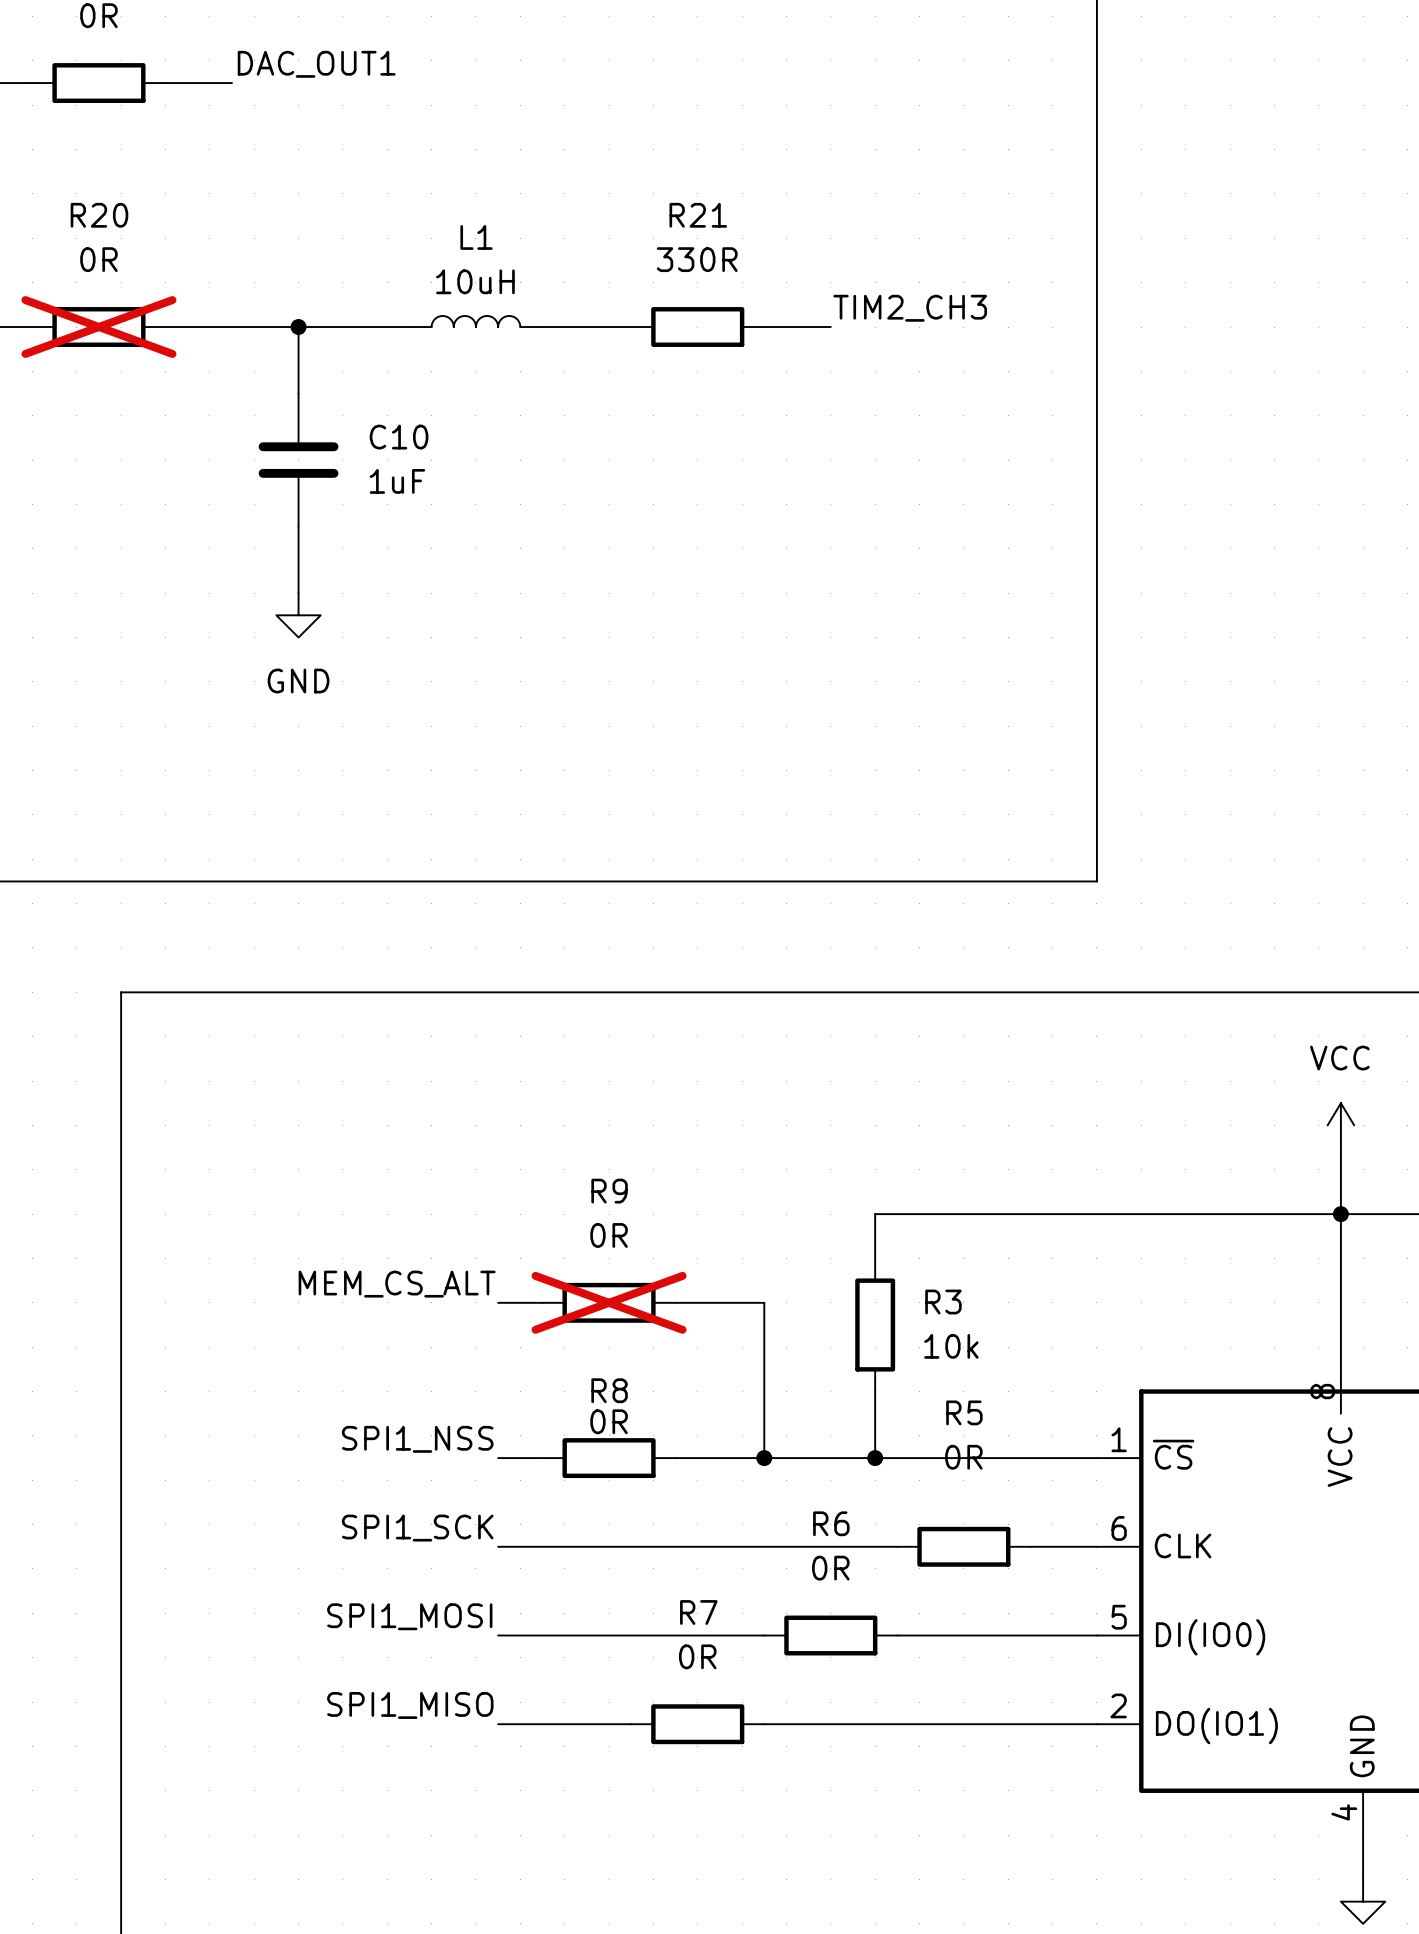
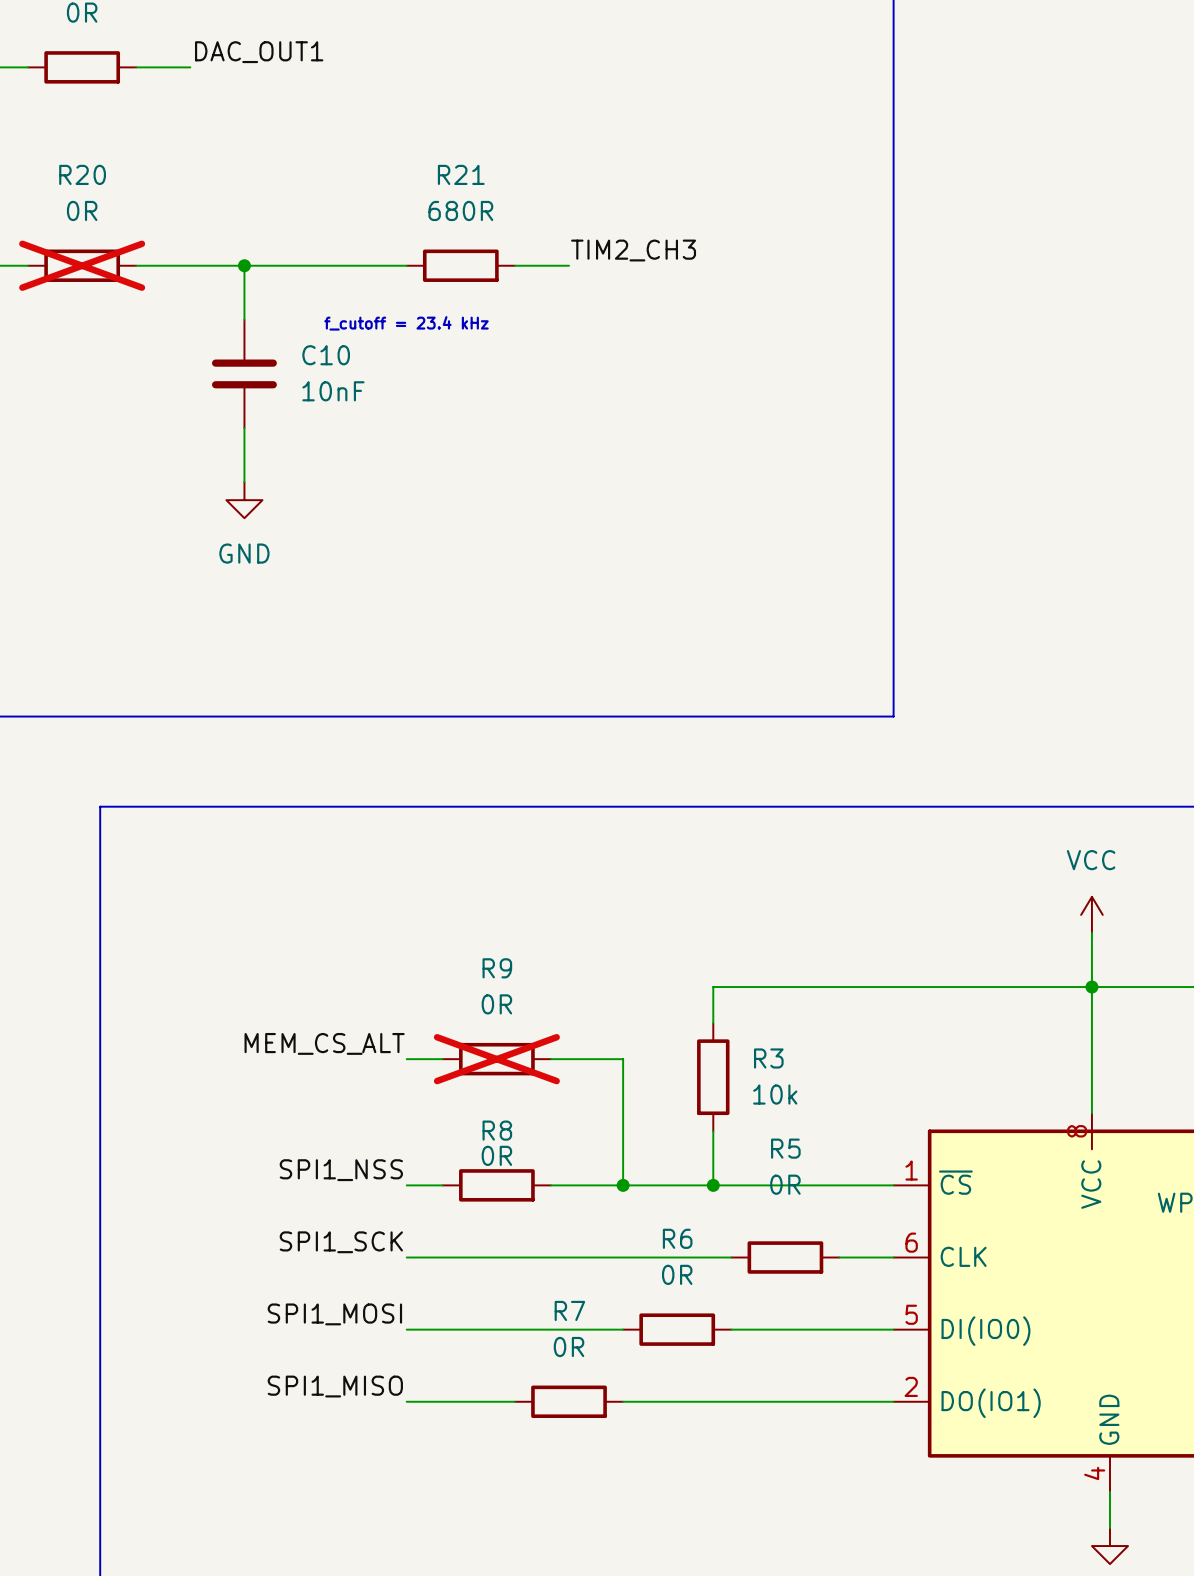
R21 value: 330R (697, 259) -> 680R (460, 210)
label position: TIM2_CH3 (910, 308) -> TIM2_CH3 (633, 250)
L1: 10uH (475, 321) -> none
wire: none -> (334, 265) (406, 265)
wire: (542, 327) (631, 327) -> (569, 265) (514, 265)
R21 position: (697, 327) -> (460, 265)
wire: (764, 327) (830, 327) -> none
text: none -> f_cutoff = 23.4 kHz (406, 323)
C10 value: 1uF (397, 481) -> 10nF (333, 391)

